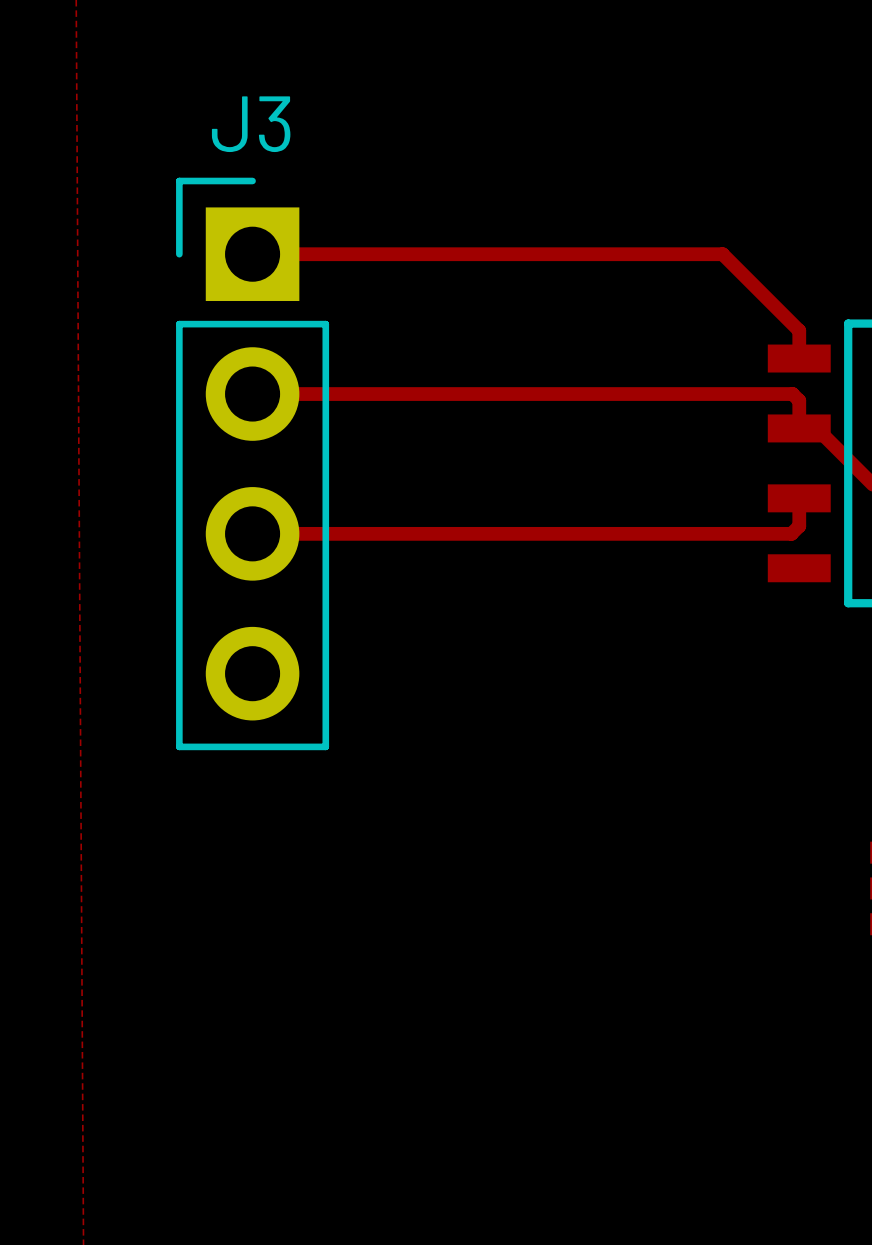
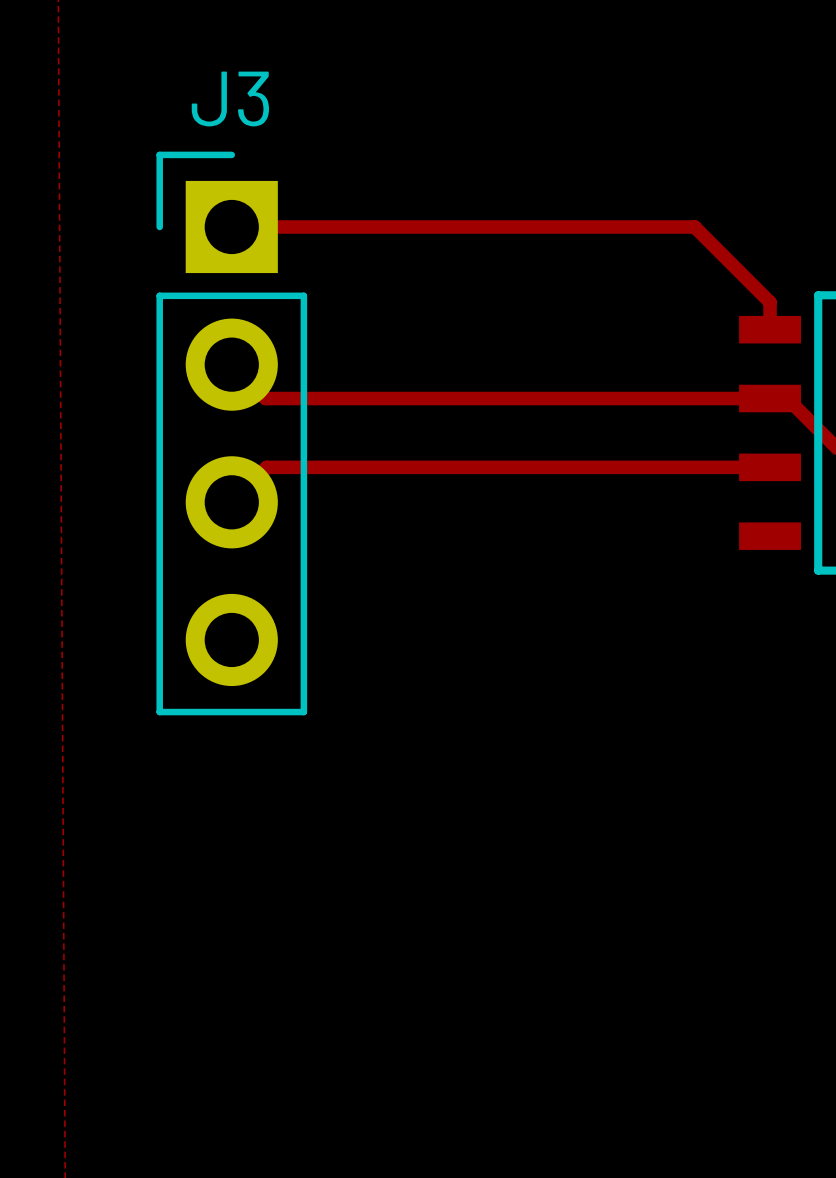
top track: (252, 394) (792, 394) (799, 400) (799, 428) -> (231, 364) (265, 398) (770, 398)
top track: (799, 498) (799, 526) (791, 533) (252, 533) -> (770, 467) (266, 467) (231, 502)

